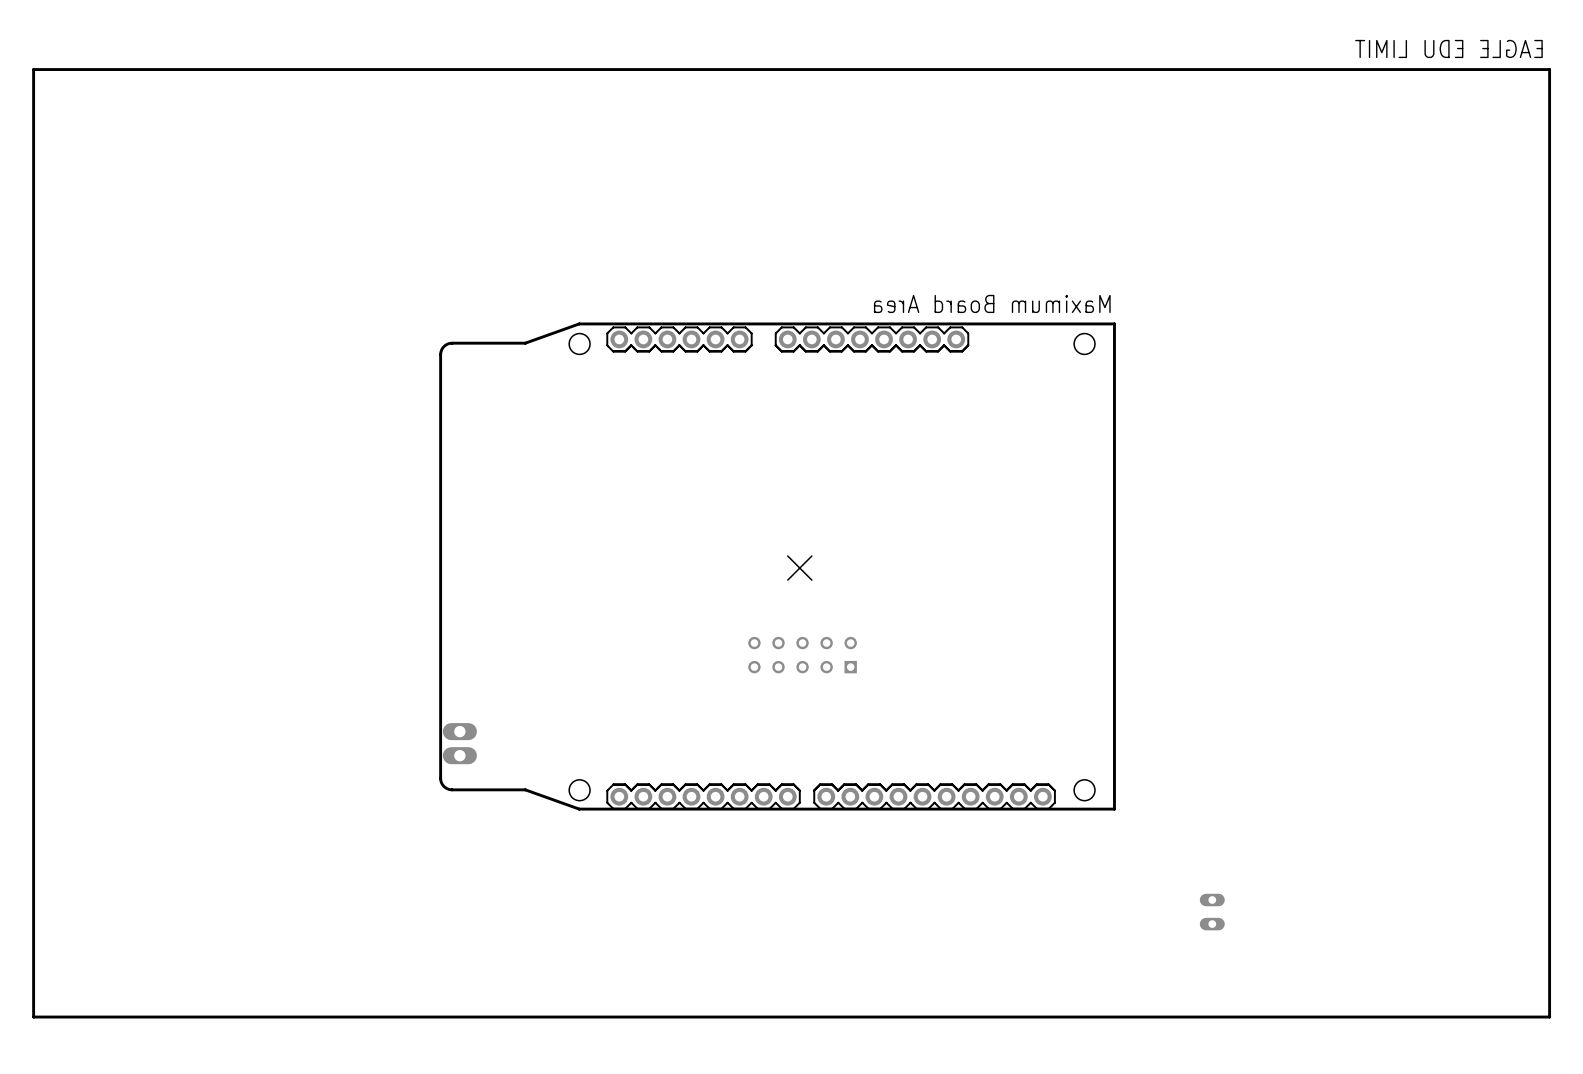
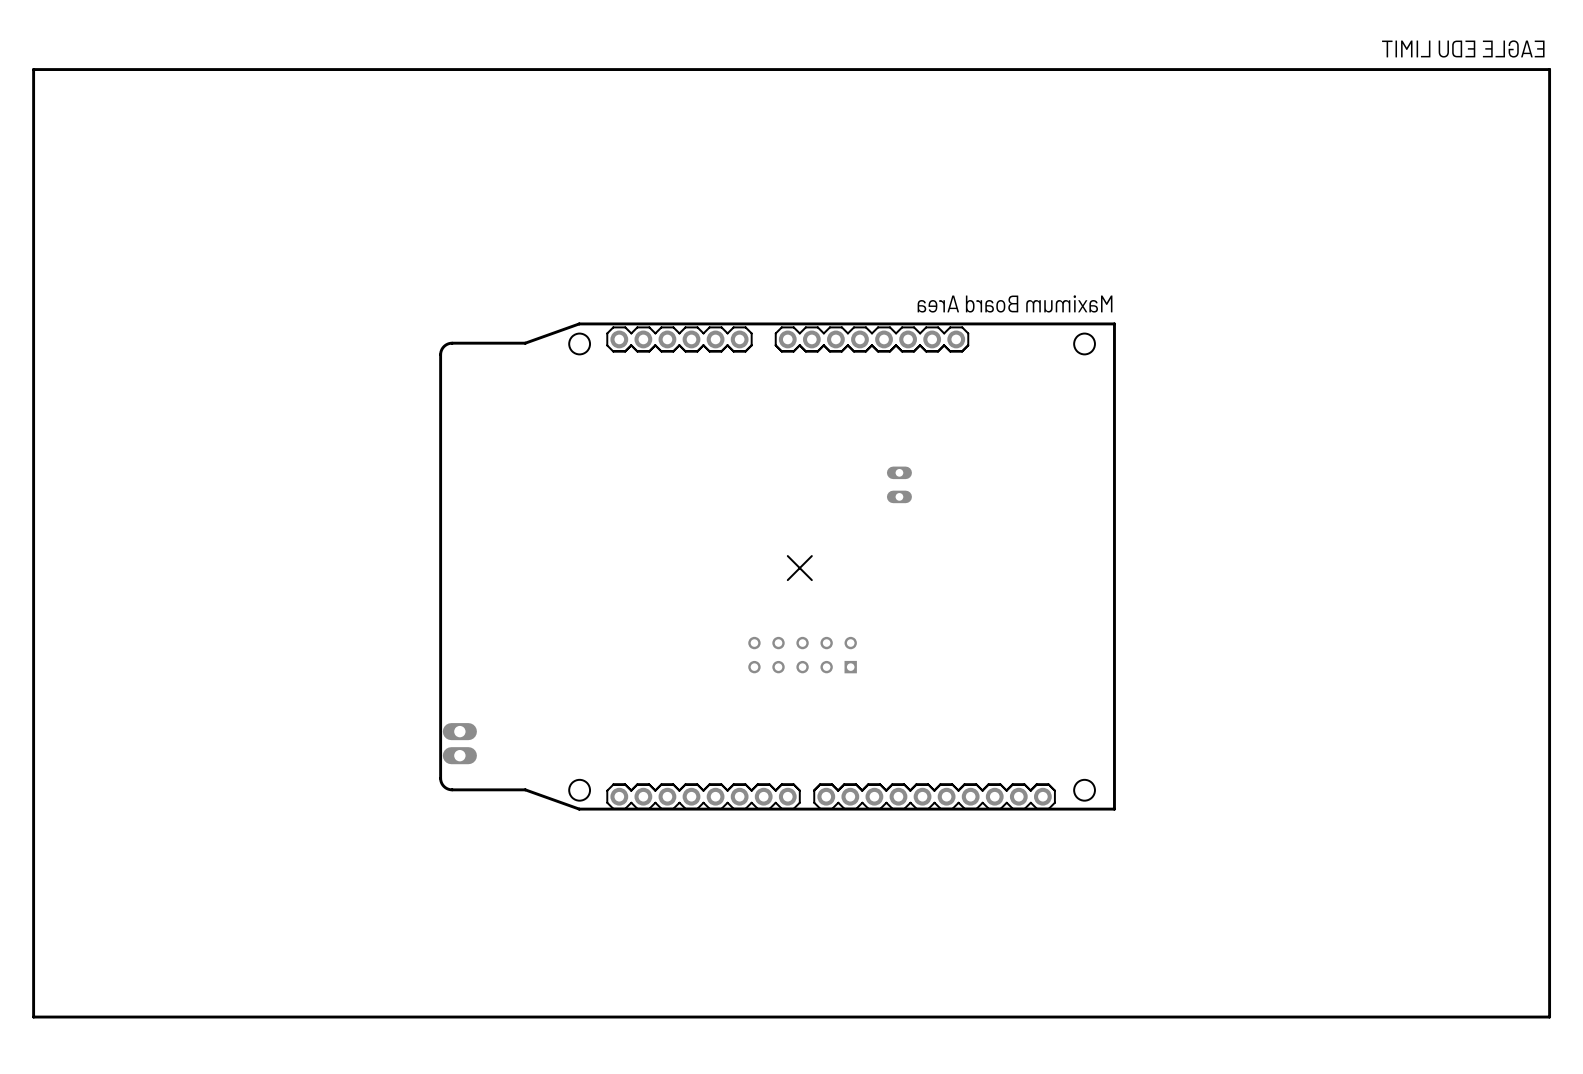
part: none -> (899, 484)
part: (1212, 912) -> none

